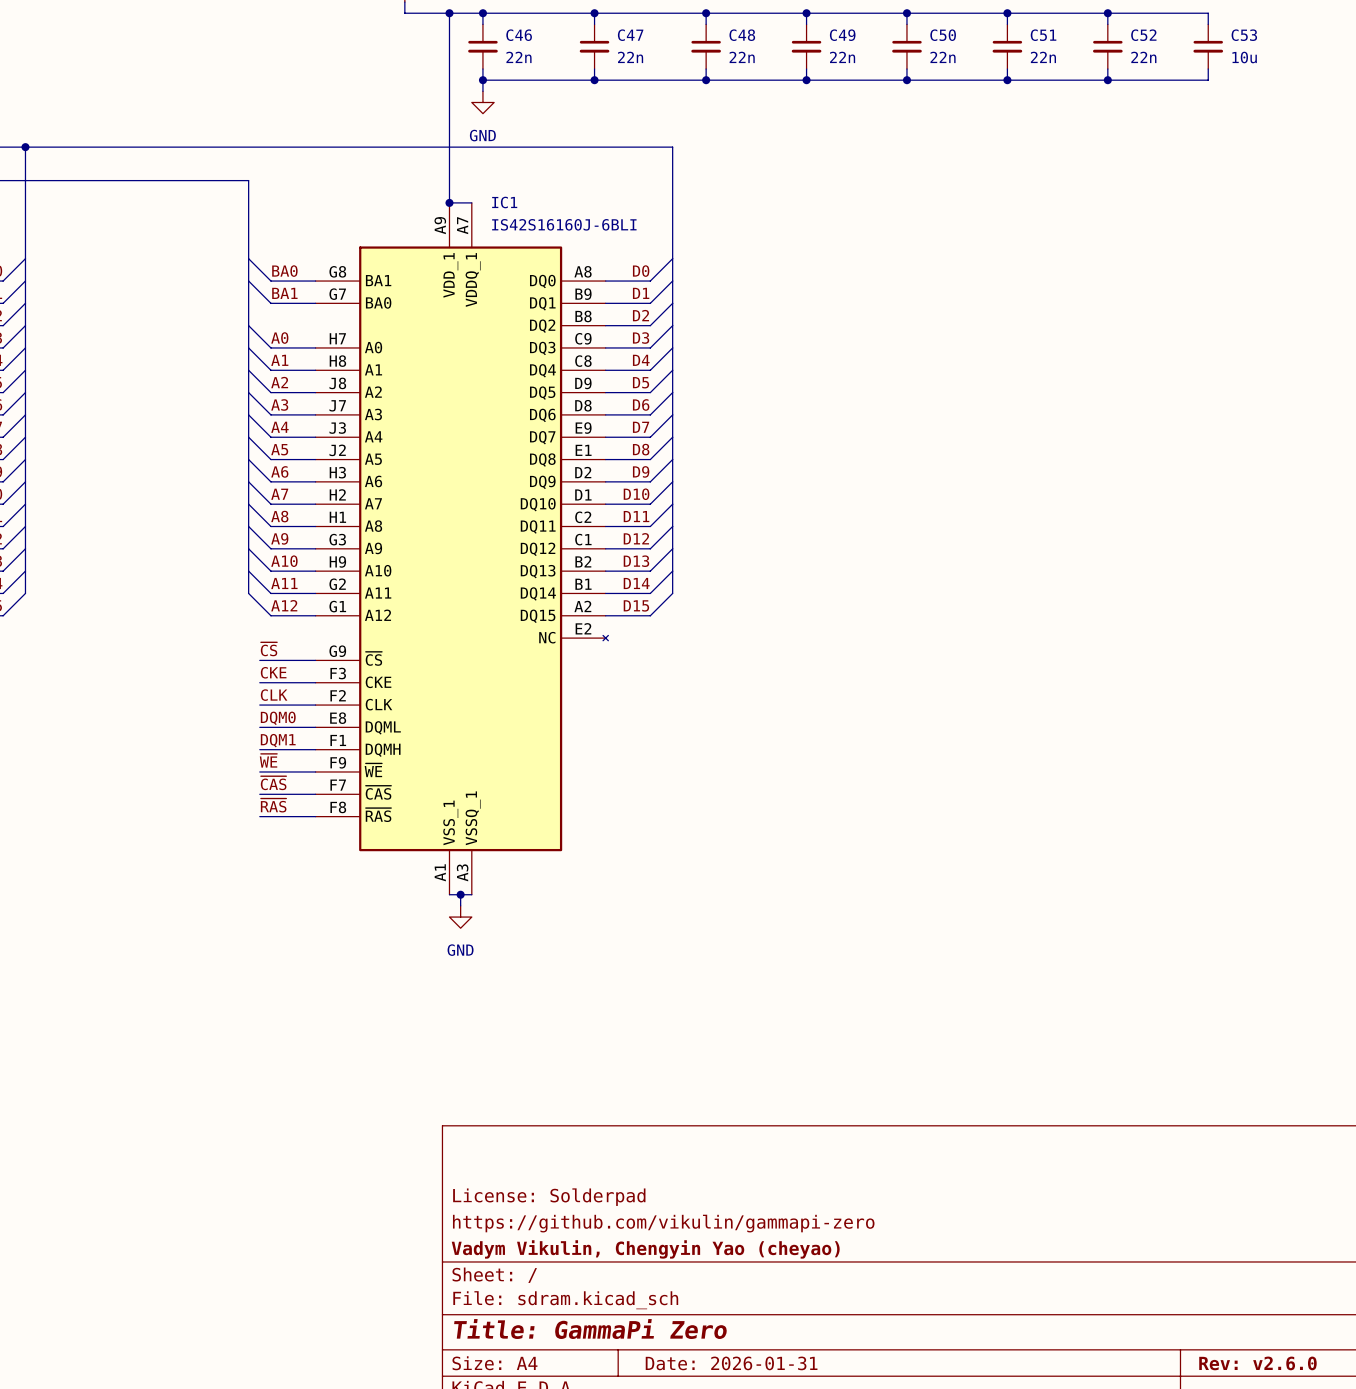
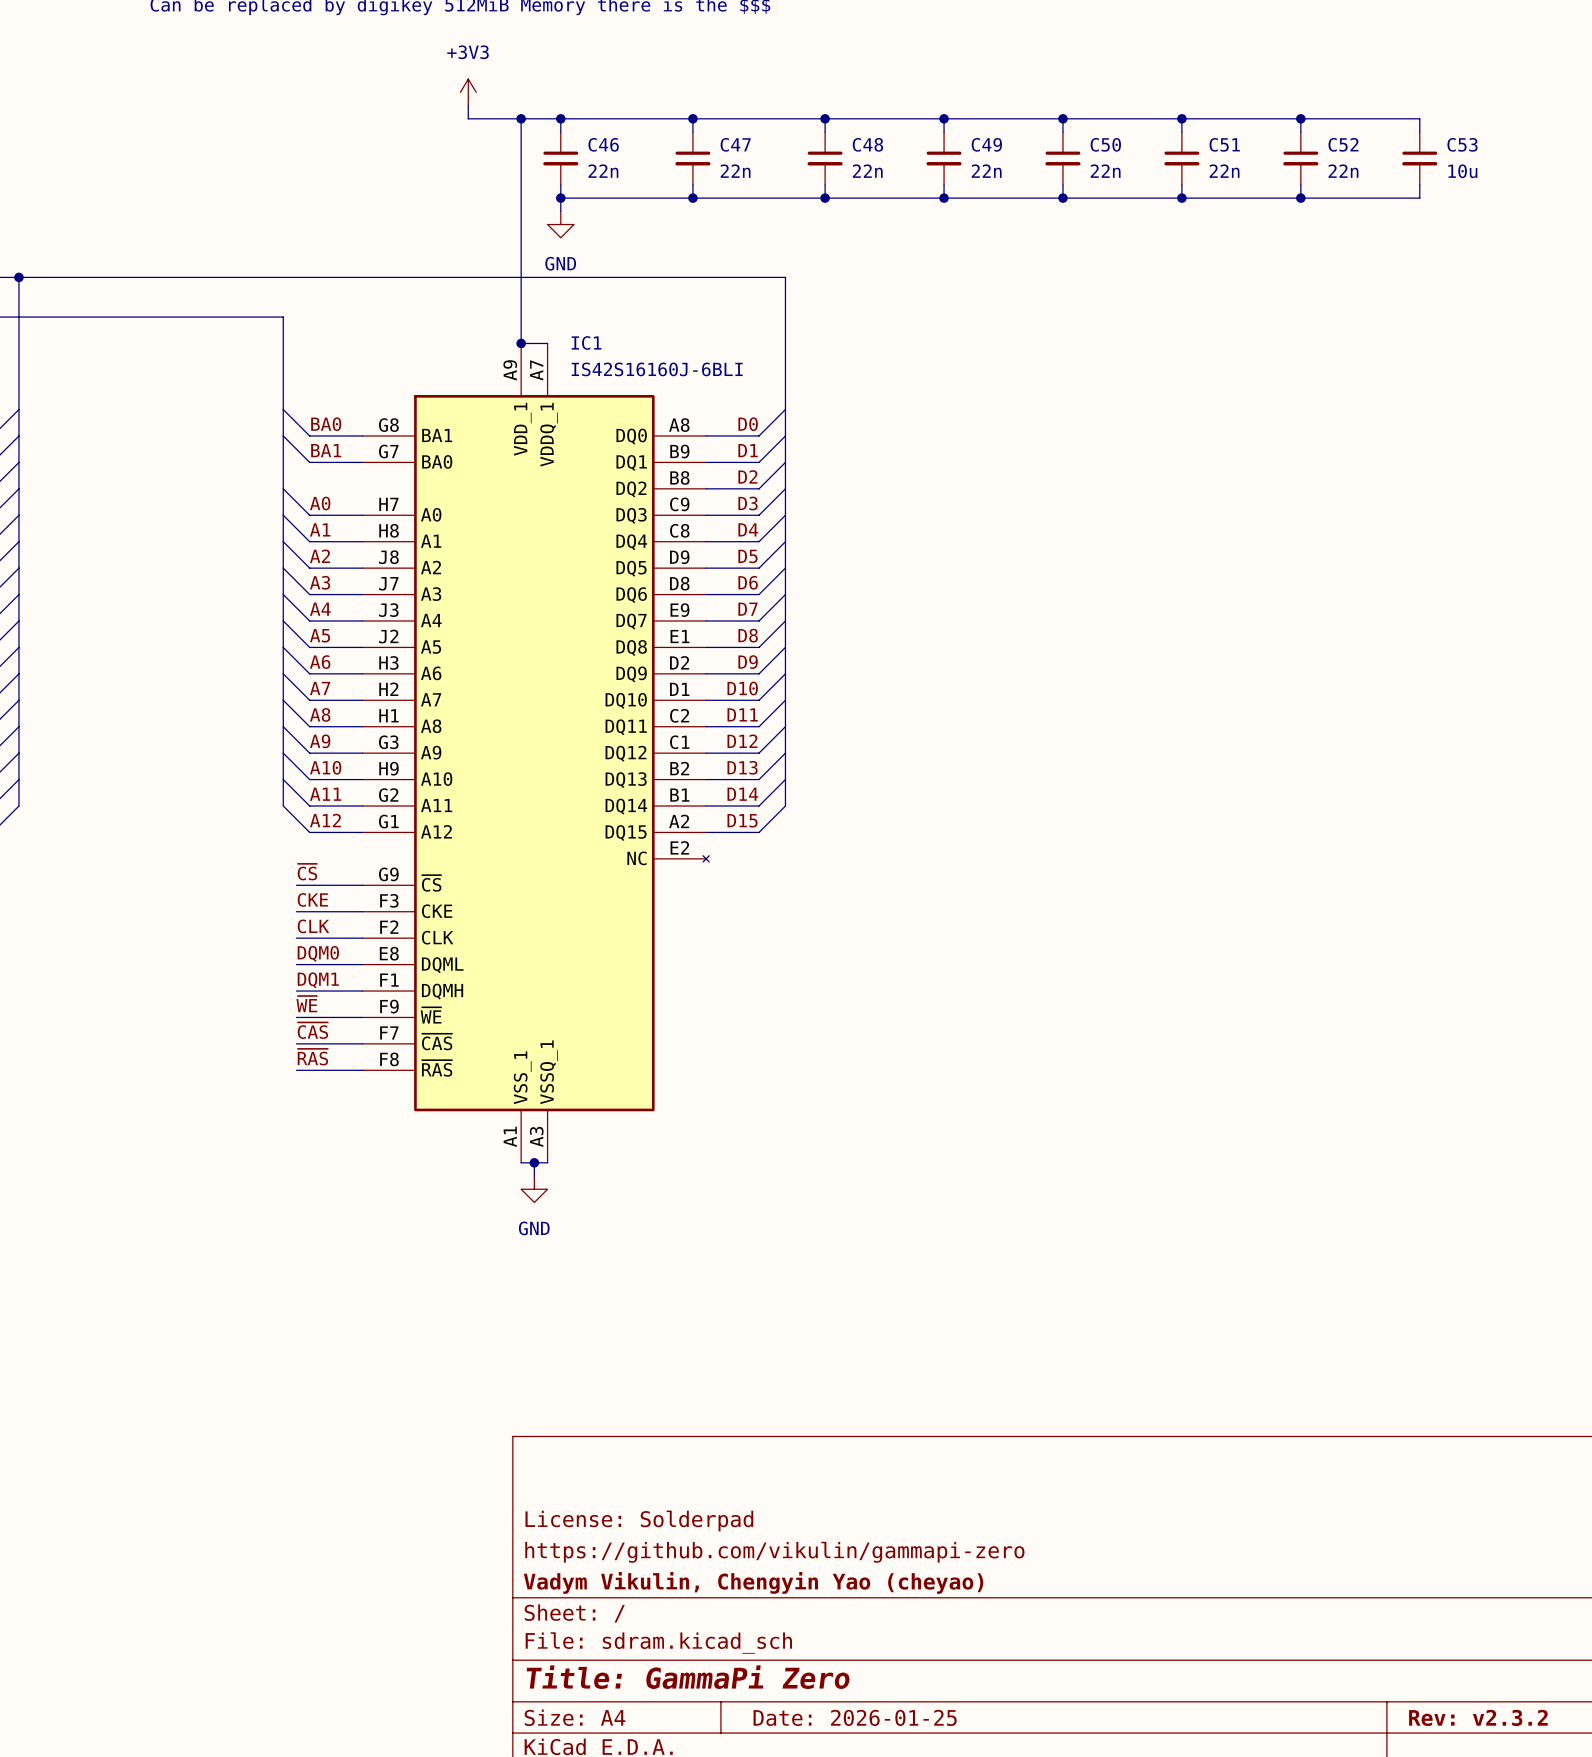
title block: Date: 2026-01-31 (731, 1363) -> Date: 2026-01-25 (855, 1717)
title block: Rev: v2.6.0 (1257, 1363) -> Rev: v2.3.2 (1478, 1717)

